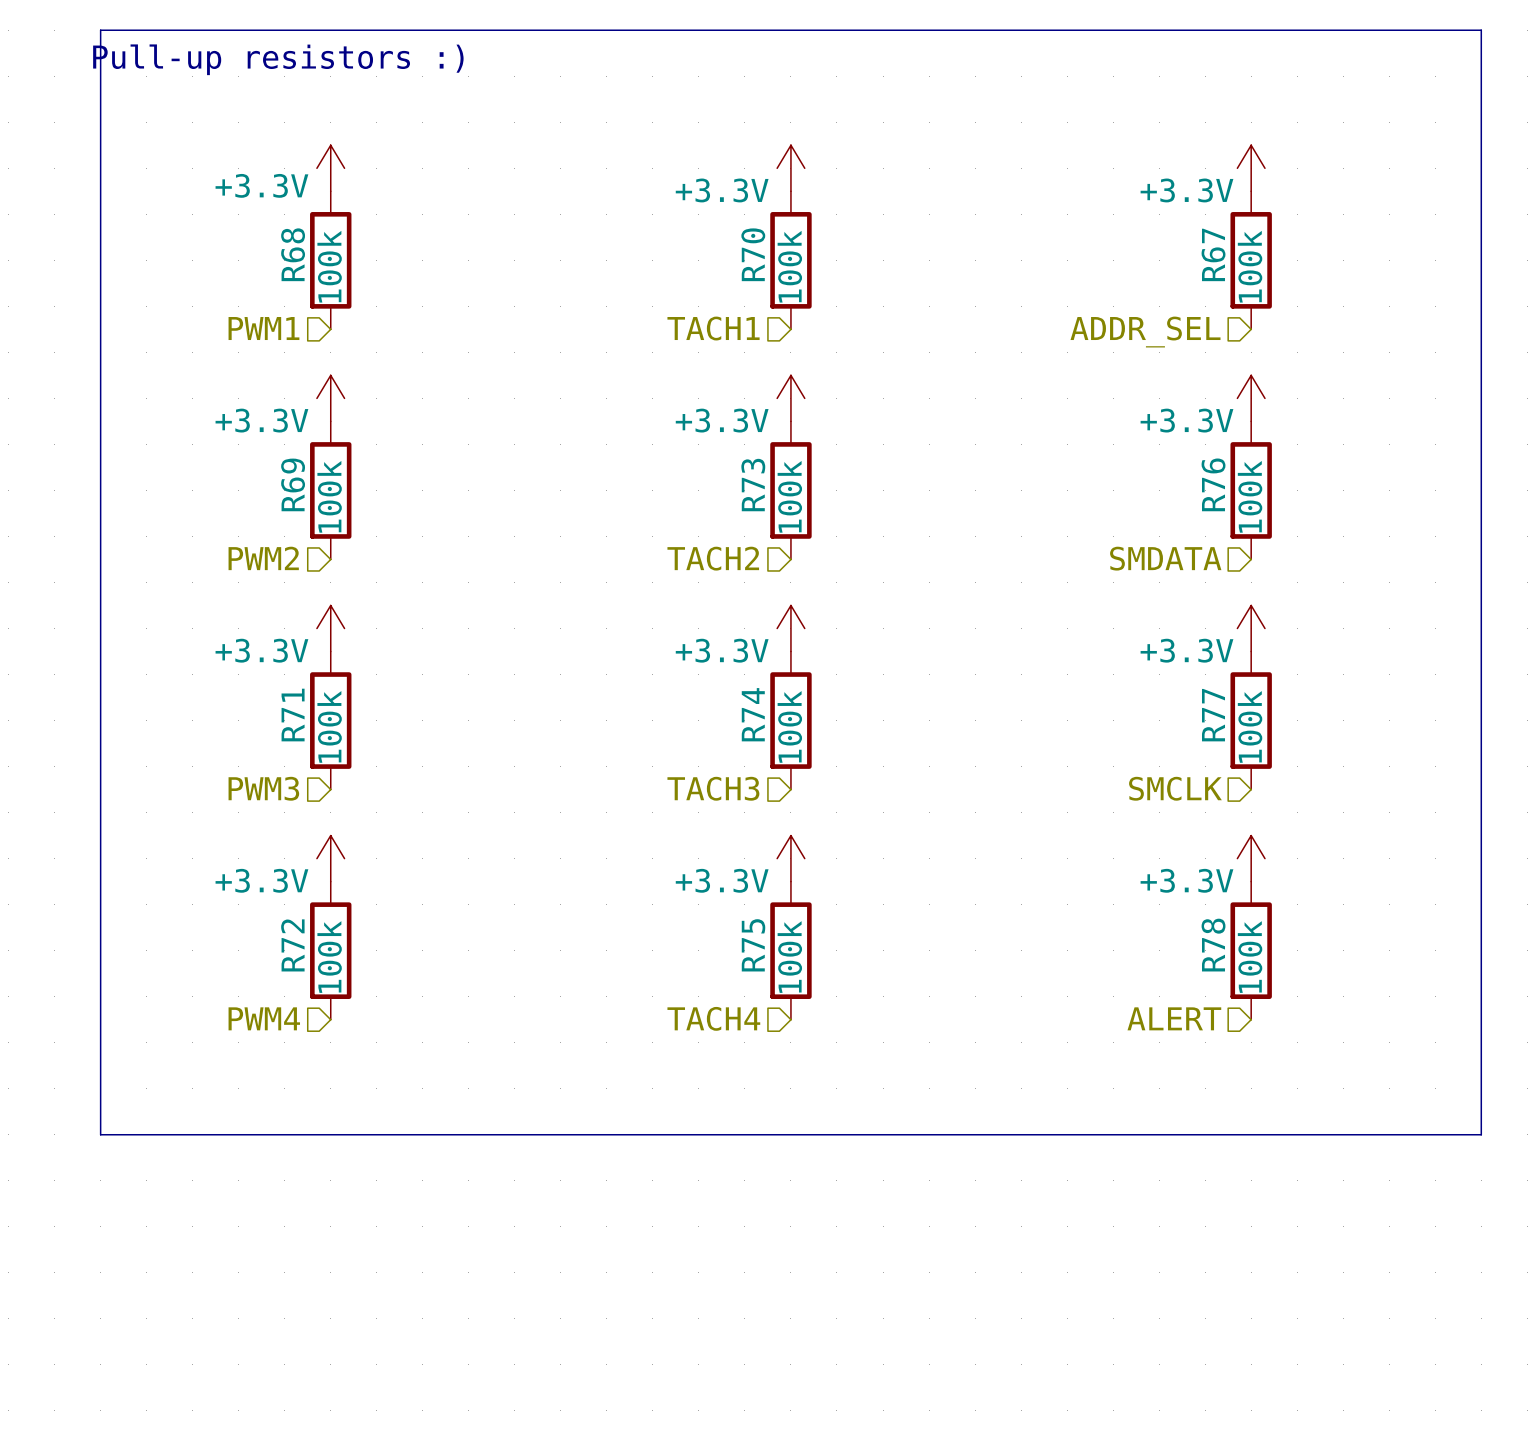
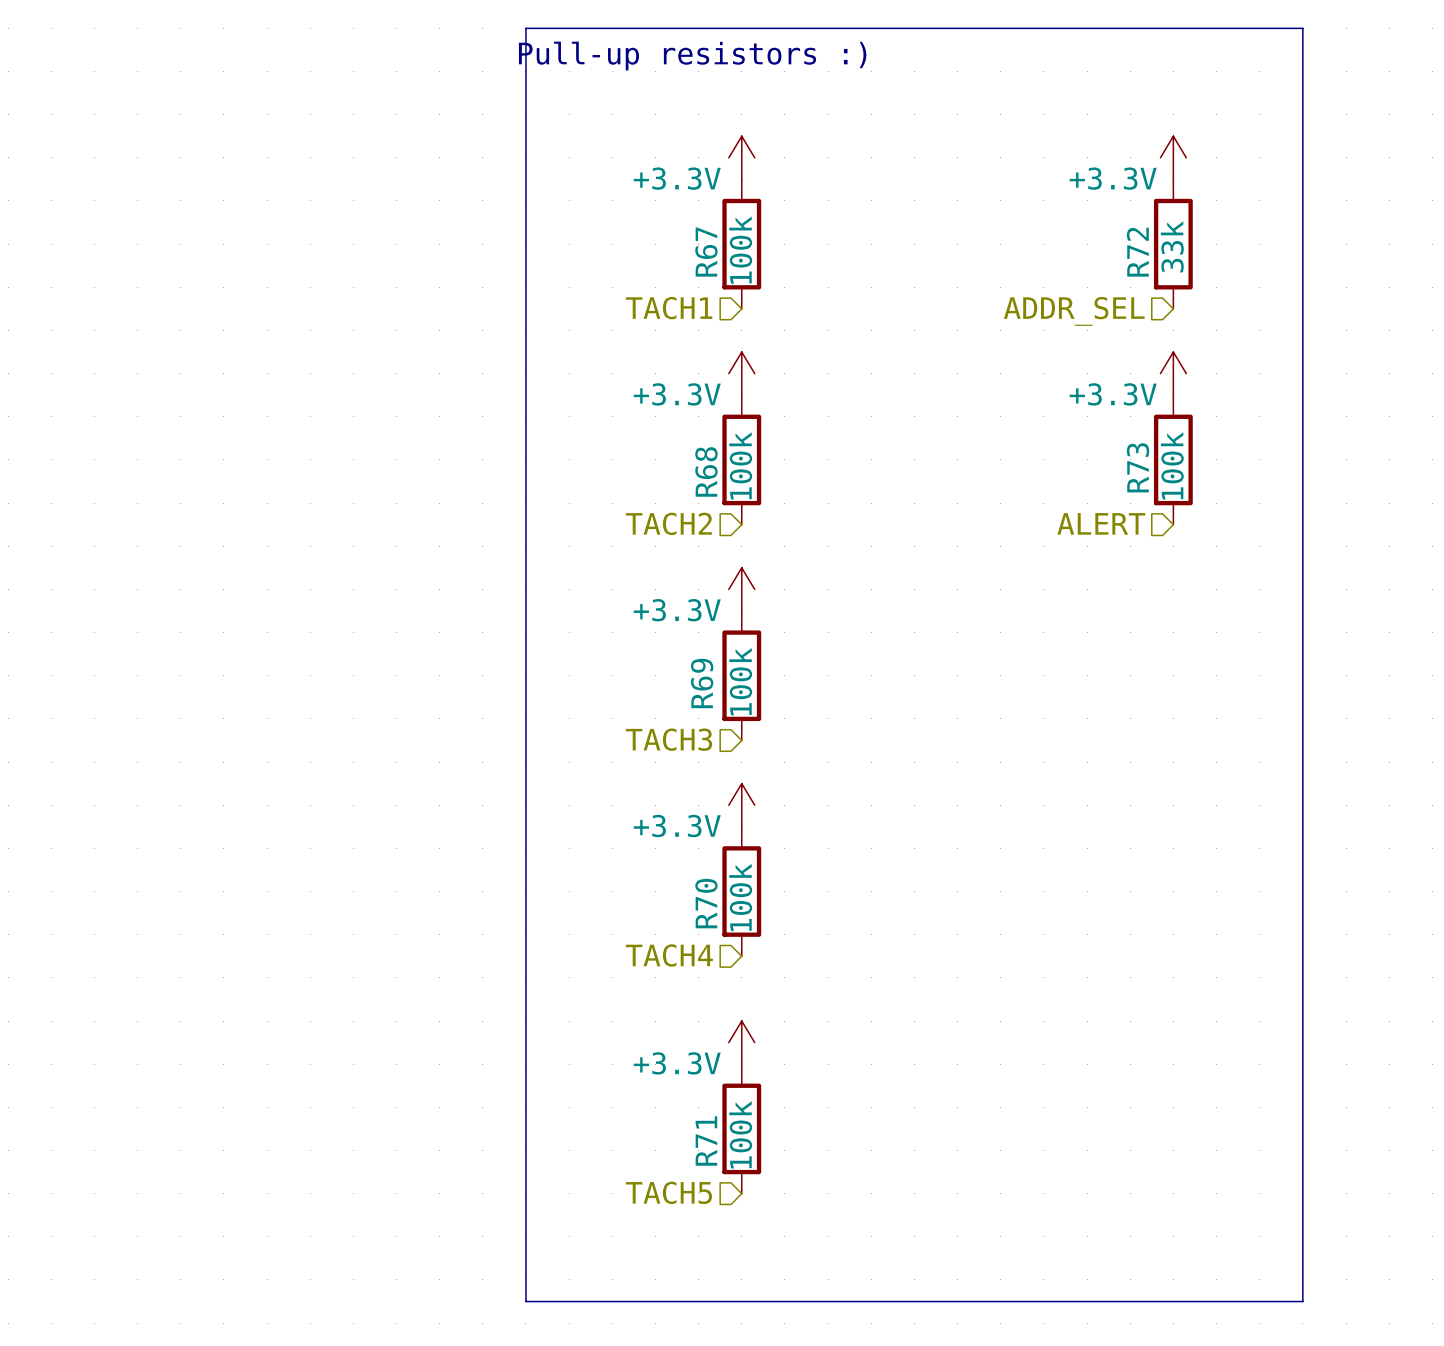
line: (560, 30) (100, 30) (100, 1134) (1481, 1134) (1481, 30) (1389, 30) -> (525, 28) (525, 1301) (1302, 1301) (1302, 28)
text: Pull-up resistors :) (278, 59) -> none
text: none -> Pull-up resistors :) (692, 56)
power symbol: +3.3V (330, 168) -> none
R70 name: R70 (753, 254) -> R67 (706, 252)
R67 name: R67 (1213, 254) -> R72 (1137, 252)
R68: 100k (330, 260) -> none
R67 value: 100k (1250, 266) -> 33k (1172, 246)
hierarchical label: PWM1 (263, 328) -> none
power symbol: +3.3V (330, 398) -> none
R76 name: R76 (1213, 484) -> R73 (1138, 467)
R73 name: R73 (753, 485) -> R68 (706, 471)
R69: 100k (330, 490) -> none
hierarchical label: PWM2 (263, 558) -> none
hierarchical label: SMDATA (1165, 558) -> ALERT (1101, 523)
power symbol: +3.3V (330, 628) -> none
power symbol: +3.3V (1251, 628) -> none
R74 name: R74 (753, 714) -> R69 (702, 683)
R71 name position: R71 (293, 715) -> R71 (706, 1141)
R71 position: (330, 720) -> (741, 1128)
R77: 100k (1251, 720) -> none
hierarchical label: PWM3 (263, 788) -> none
hierarchical label: SMCLK (1175, 788) -> none
power symbol: +3.3V (330, 858) -> none
power symbol: +3.3V (1251, 858) -> none
R75 name: R75 (753, 945) -> R70 (706, 903)
R72: 100k (330, 950) -> none
R78: 100k (1251, 950) -> none
hierarchical label: PWM4 (264, 1018) -> none
hierarchical label: ALERT (1174, 1018) -> none
power symbol: none -> +3.3V (741, 1042)
hierarchical label: none -> TACH5 (668, 1192)

